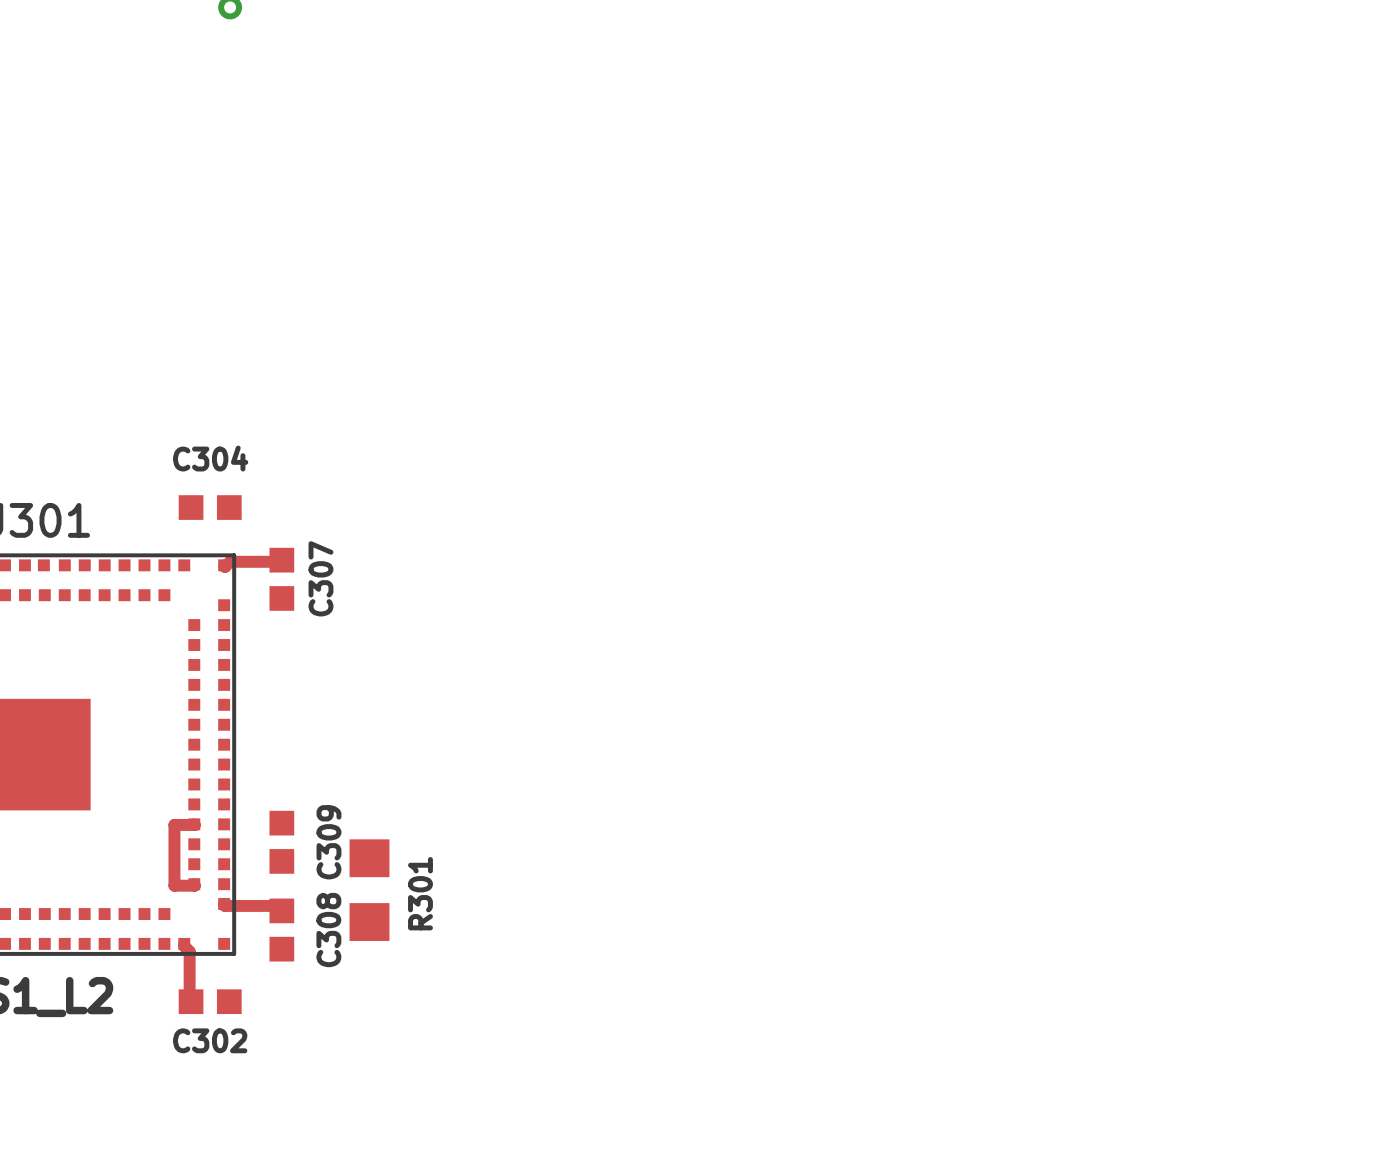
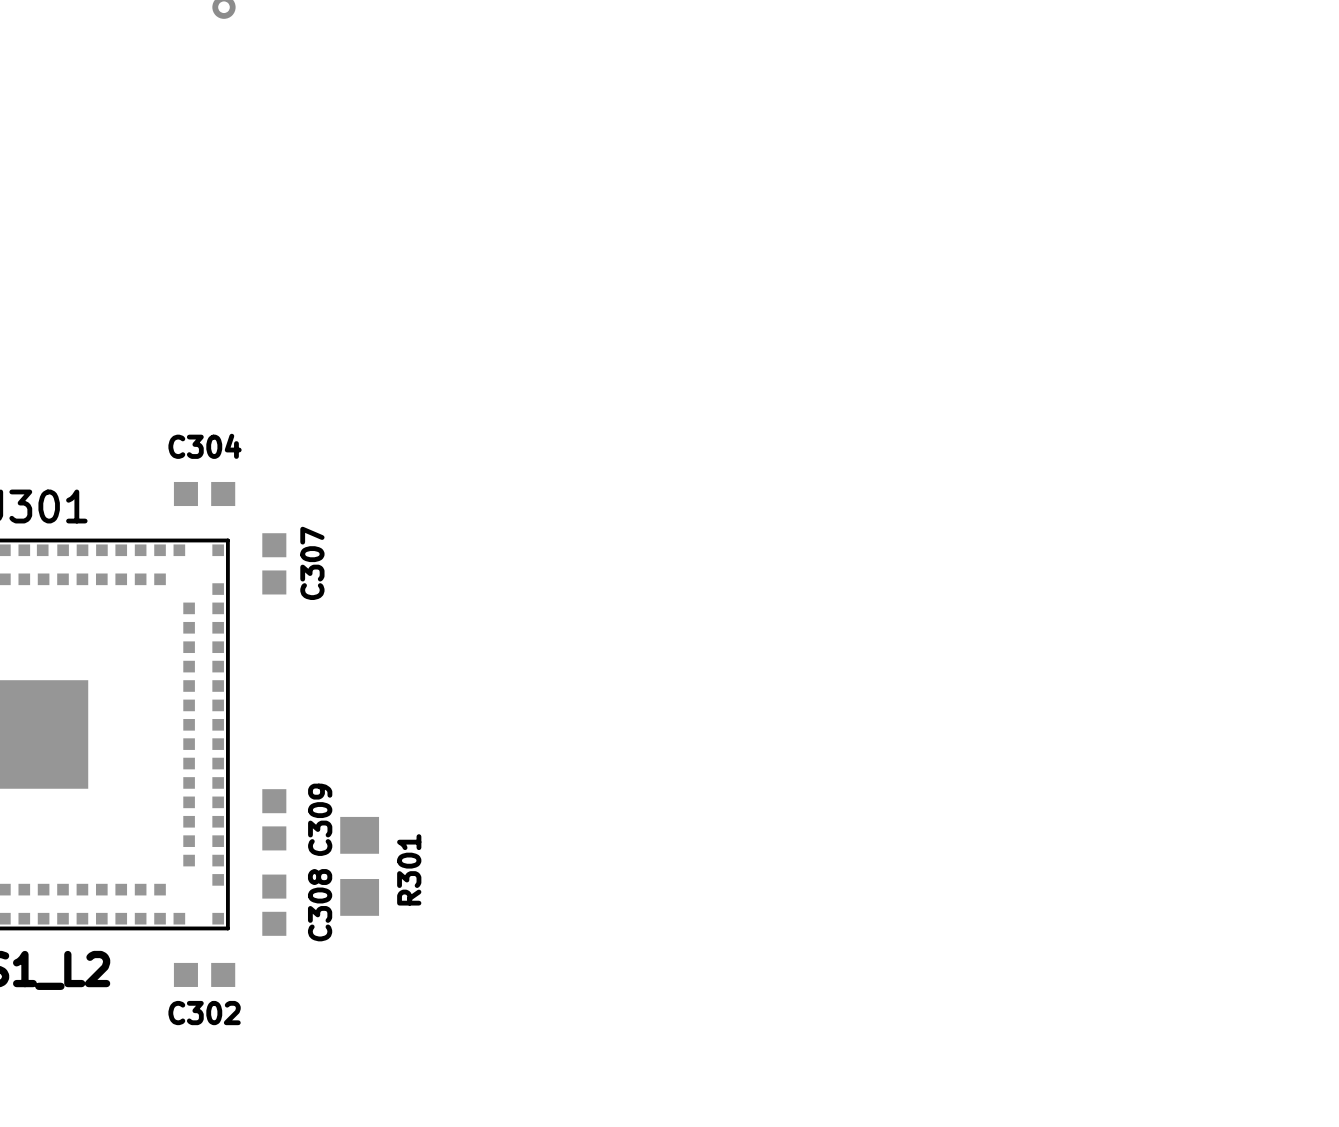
track: (281, 560) (280, 561) (230, 561) (225, 566) (224, 565) -> none
track: (194, 824) (174, 824) (174, 885) (194, 885) (194, 884) -> none
track: (224, 904) (225, 905) (275, 905) (281, 910) -> none
track: (184, 943) (189, 951) (191, 1001) -> none

